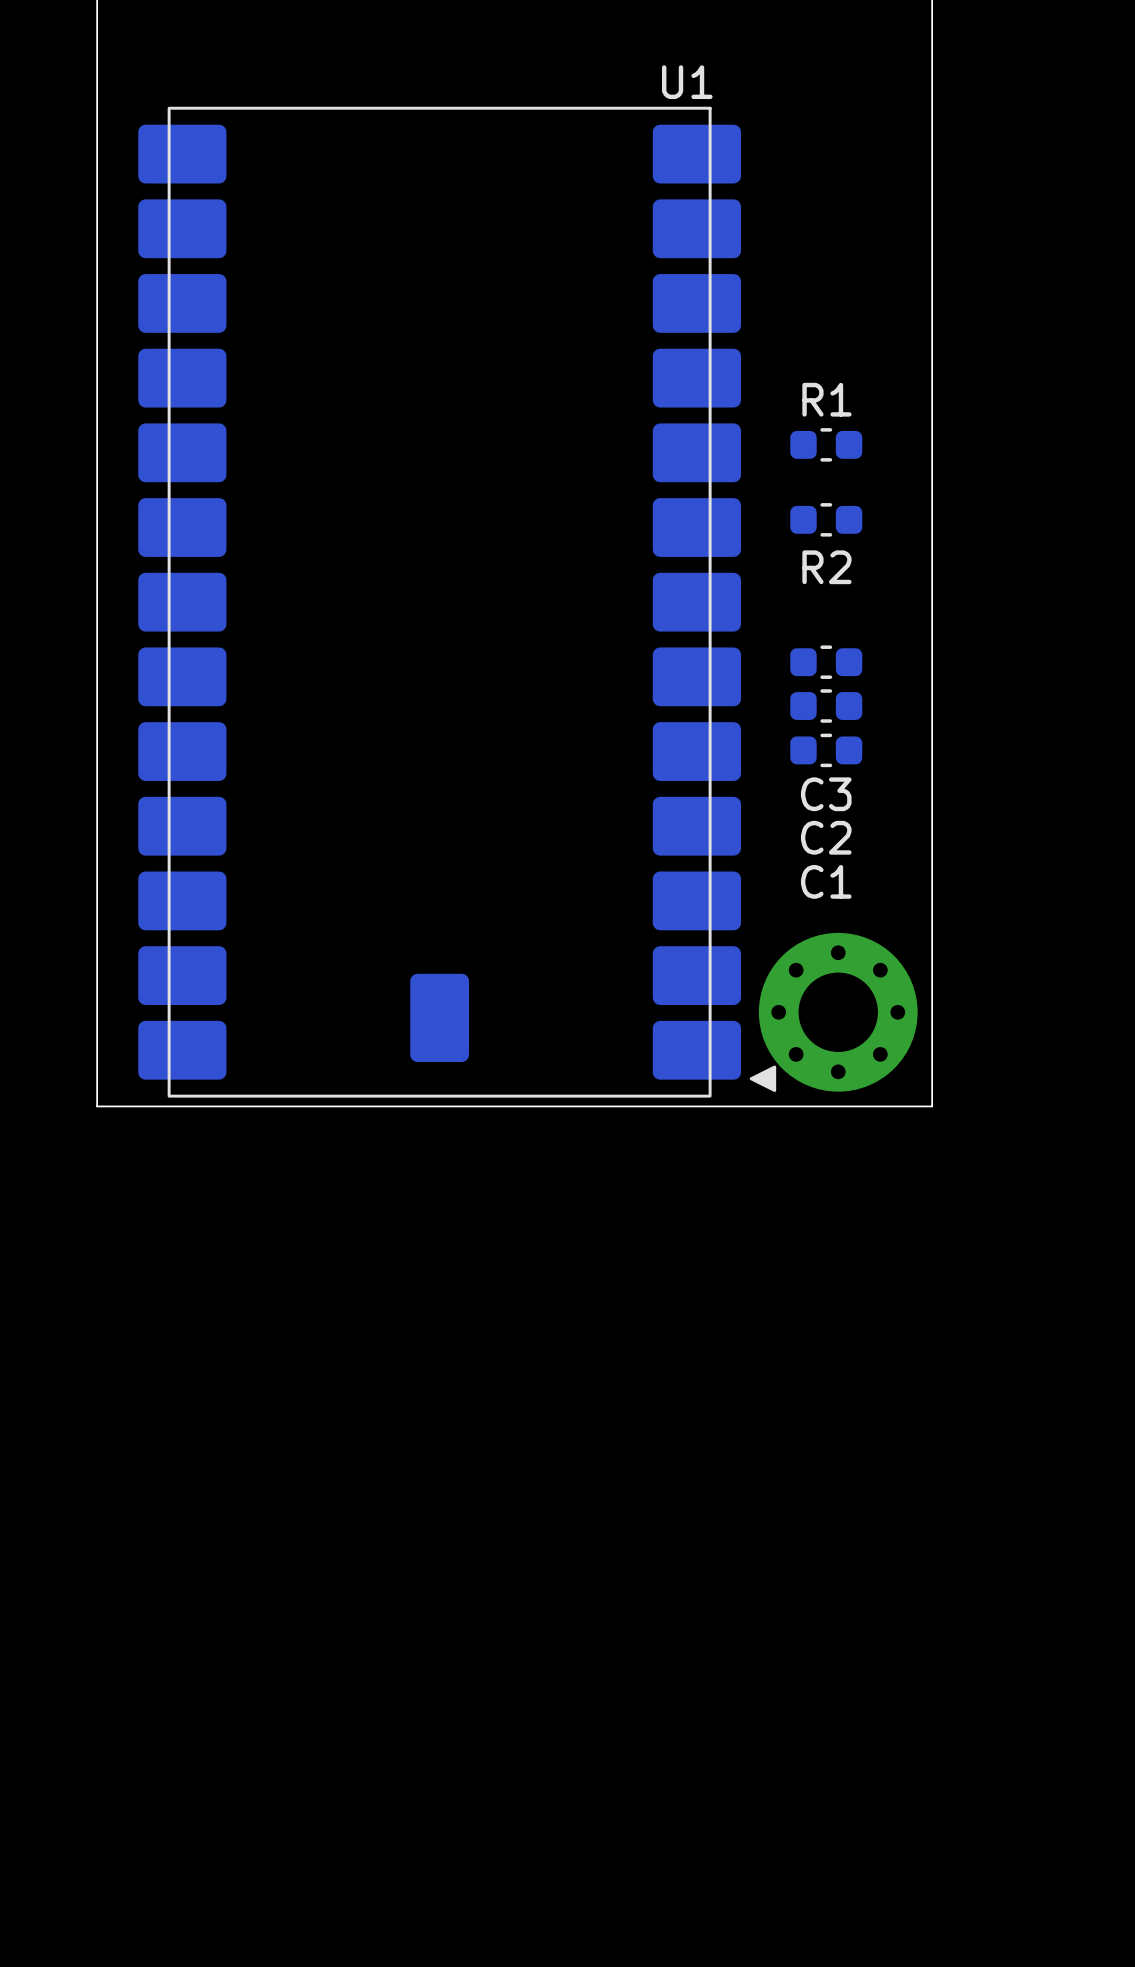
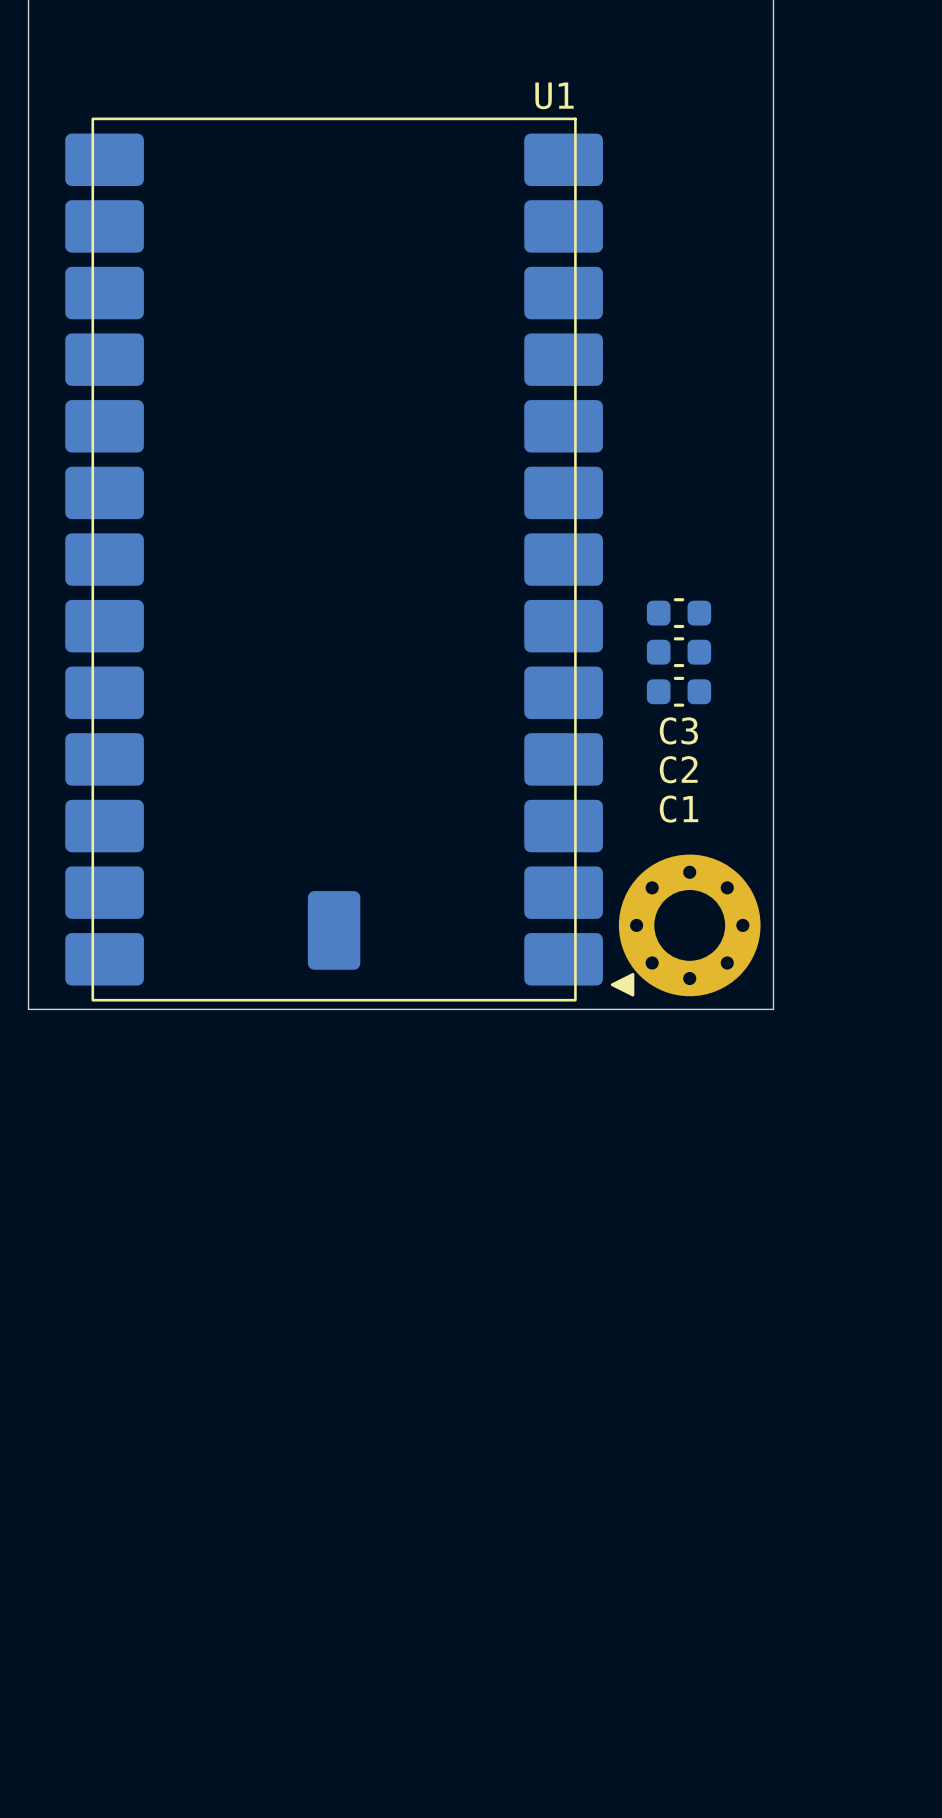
R1: (826, 444) -> none
R2: (826, 519) -> none

